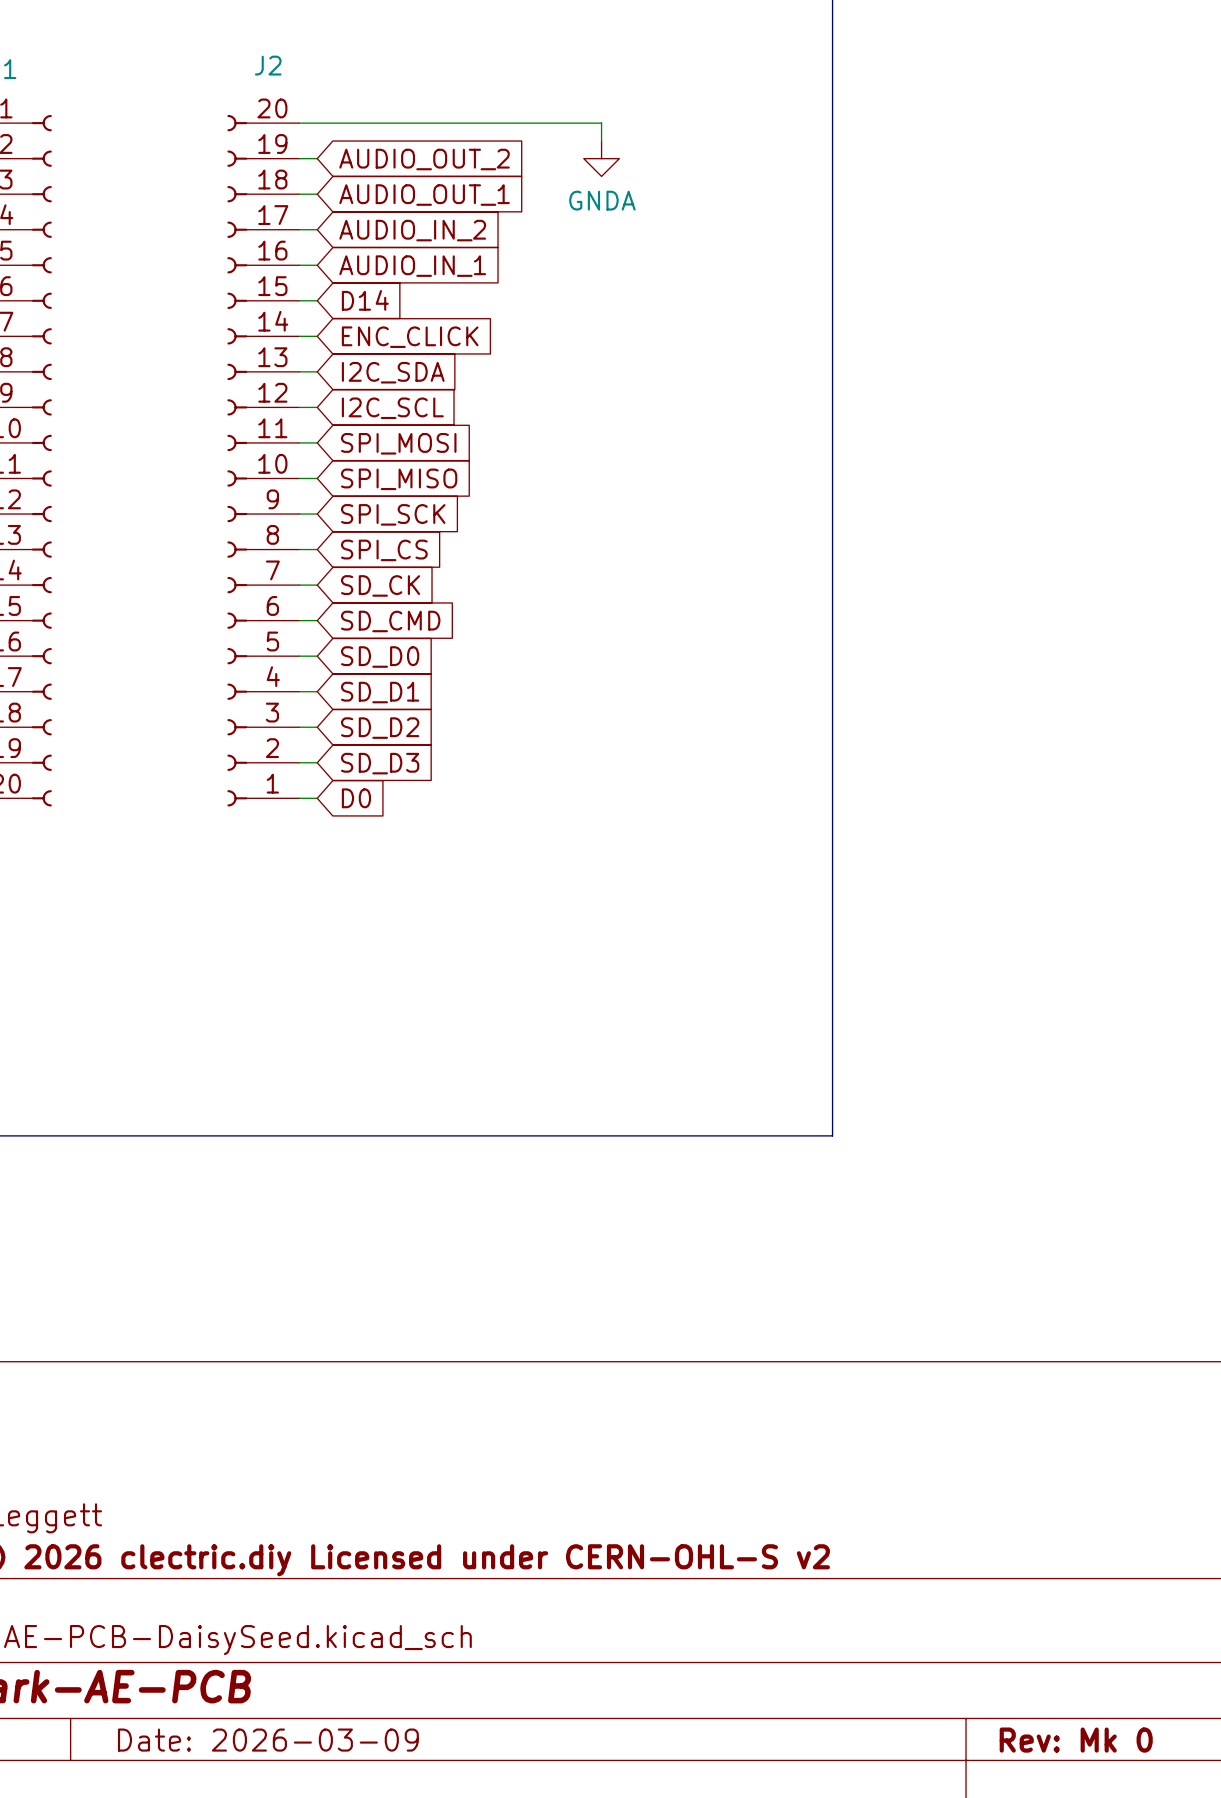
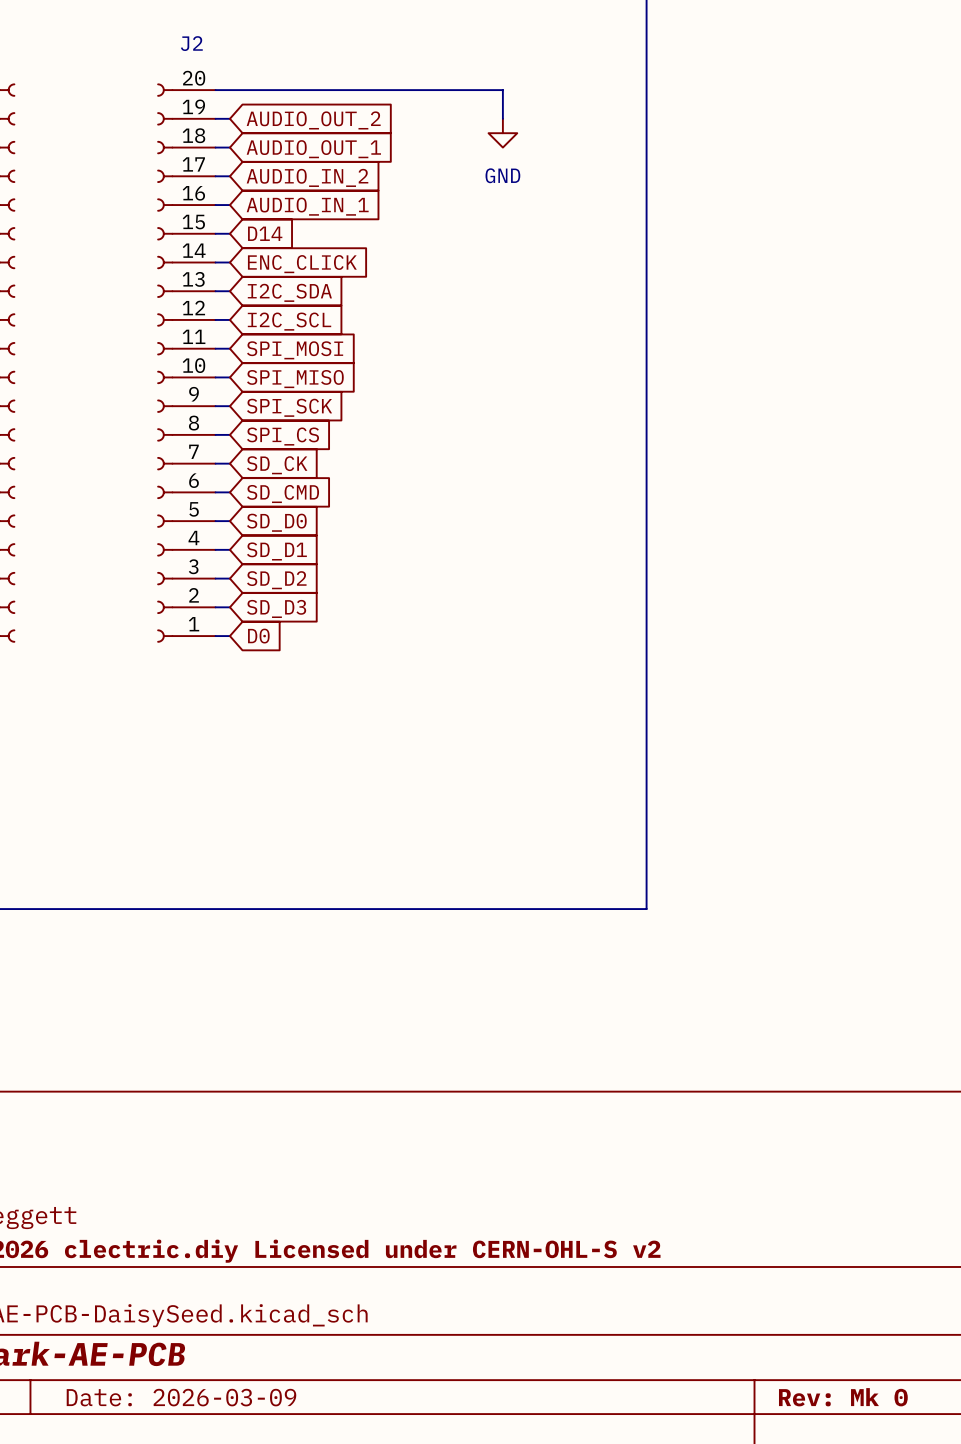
wire: (601, 123) (601, 140) -> (459, 90) (502, 90) (502, 118)
power symbol: GNDA (601, 158) -> none
power symbol: none -> GND (502, 133)

